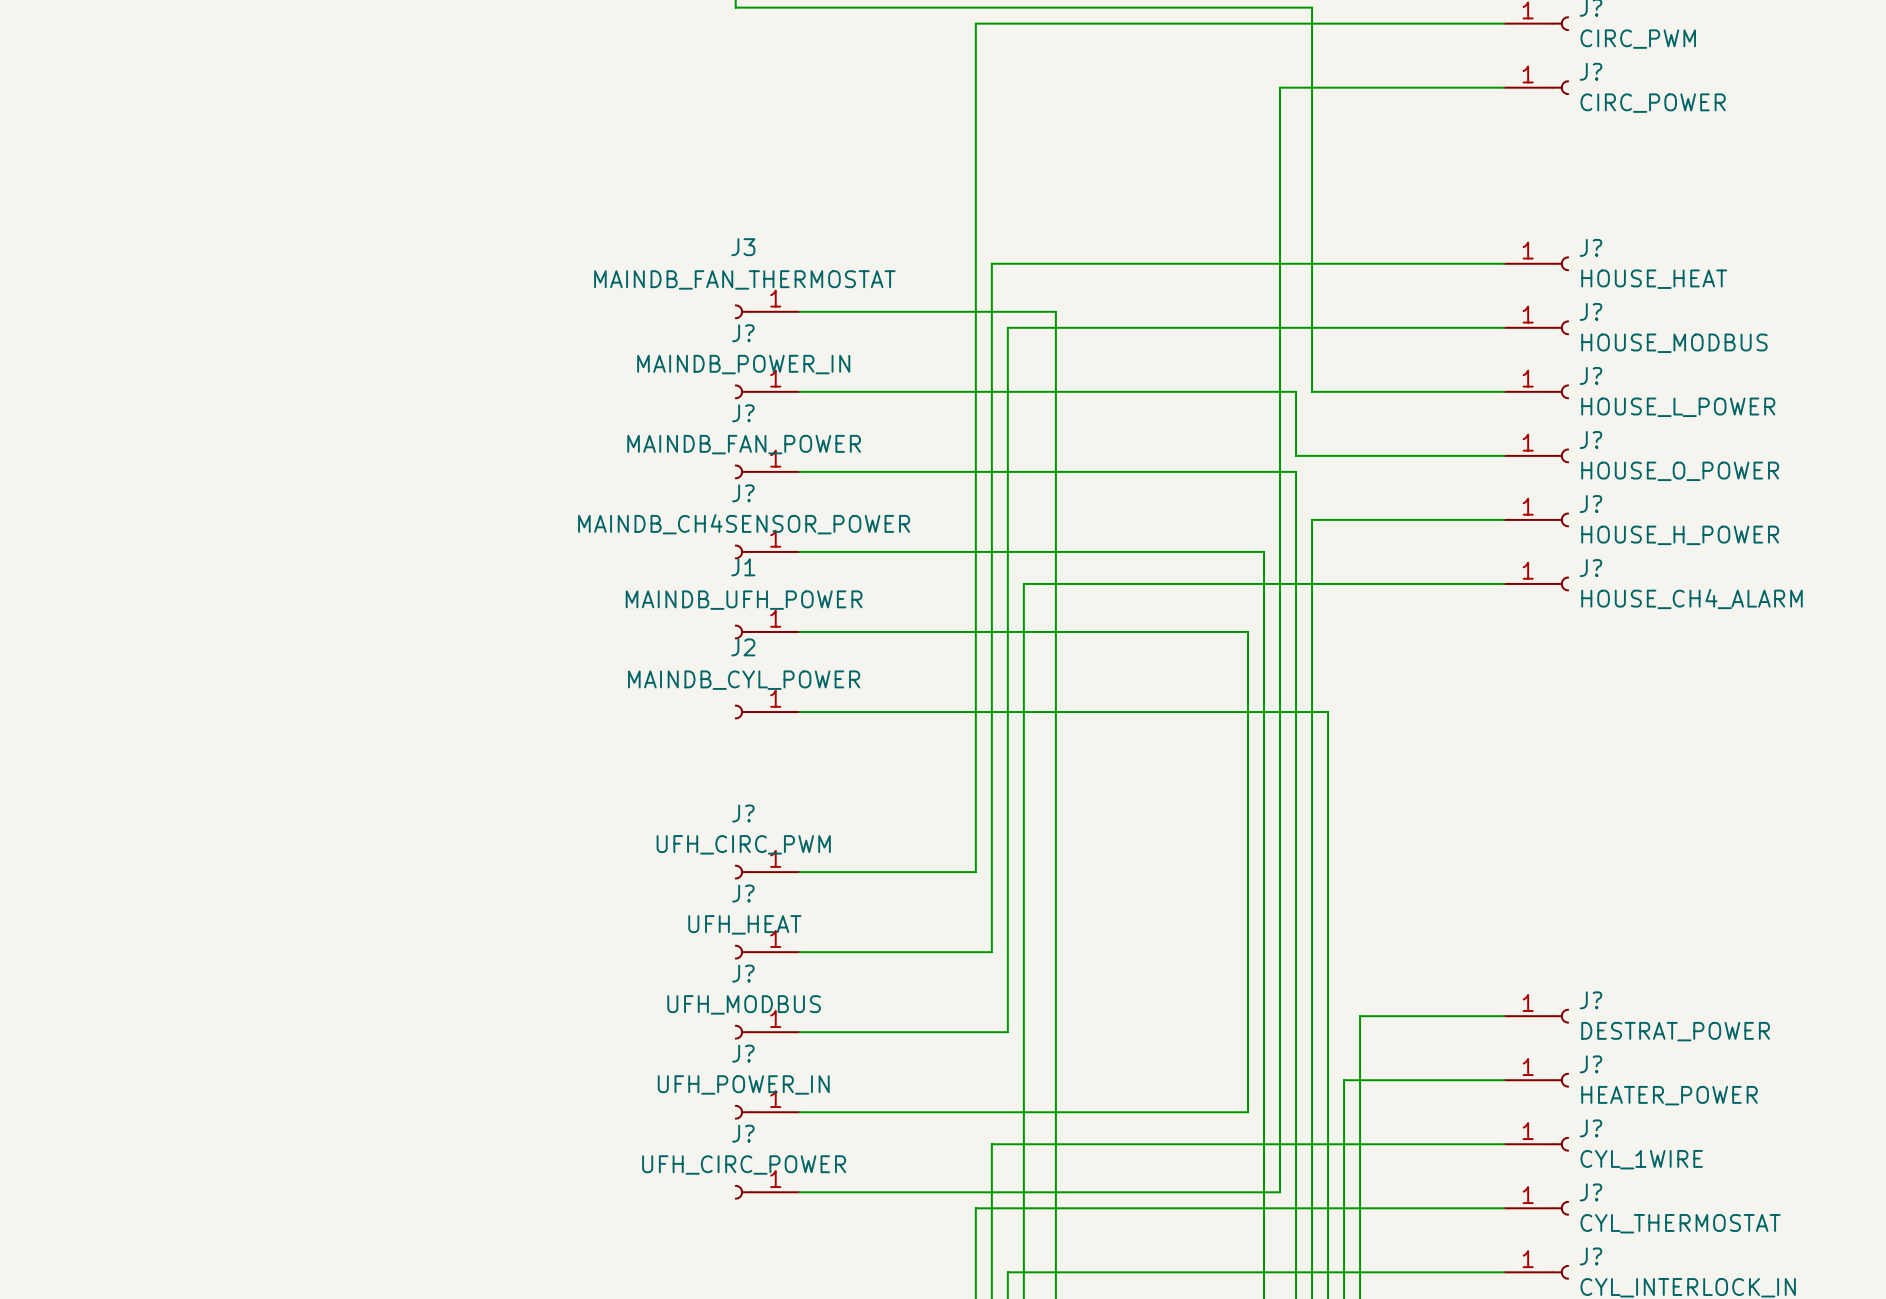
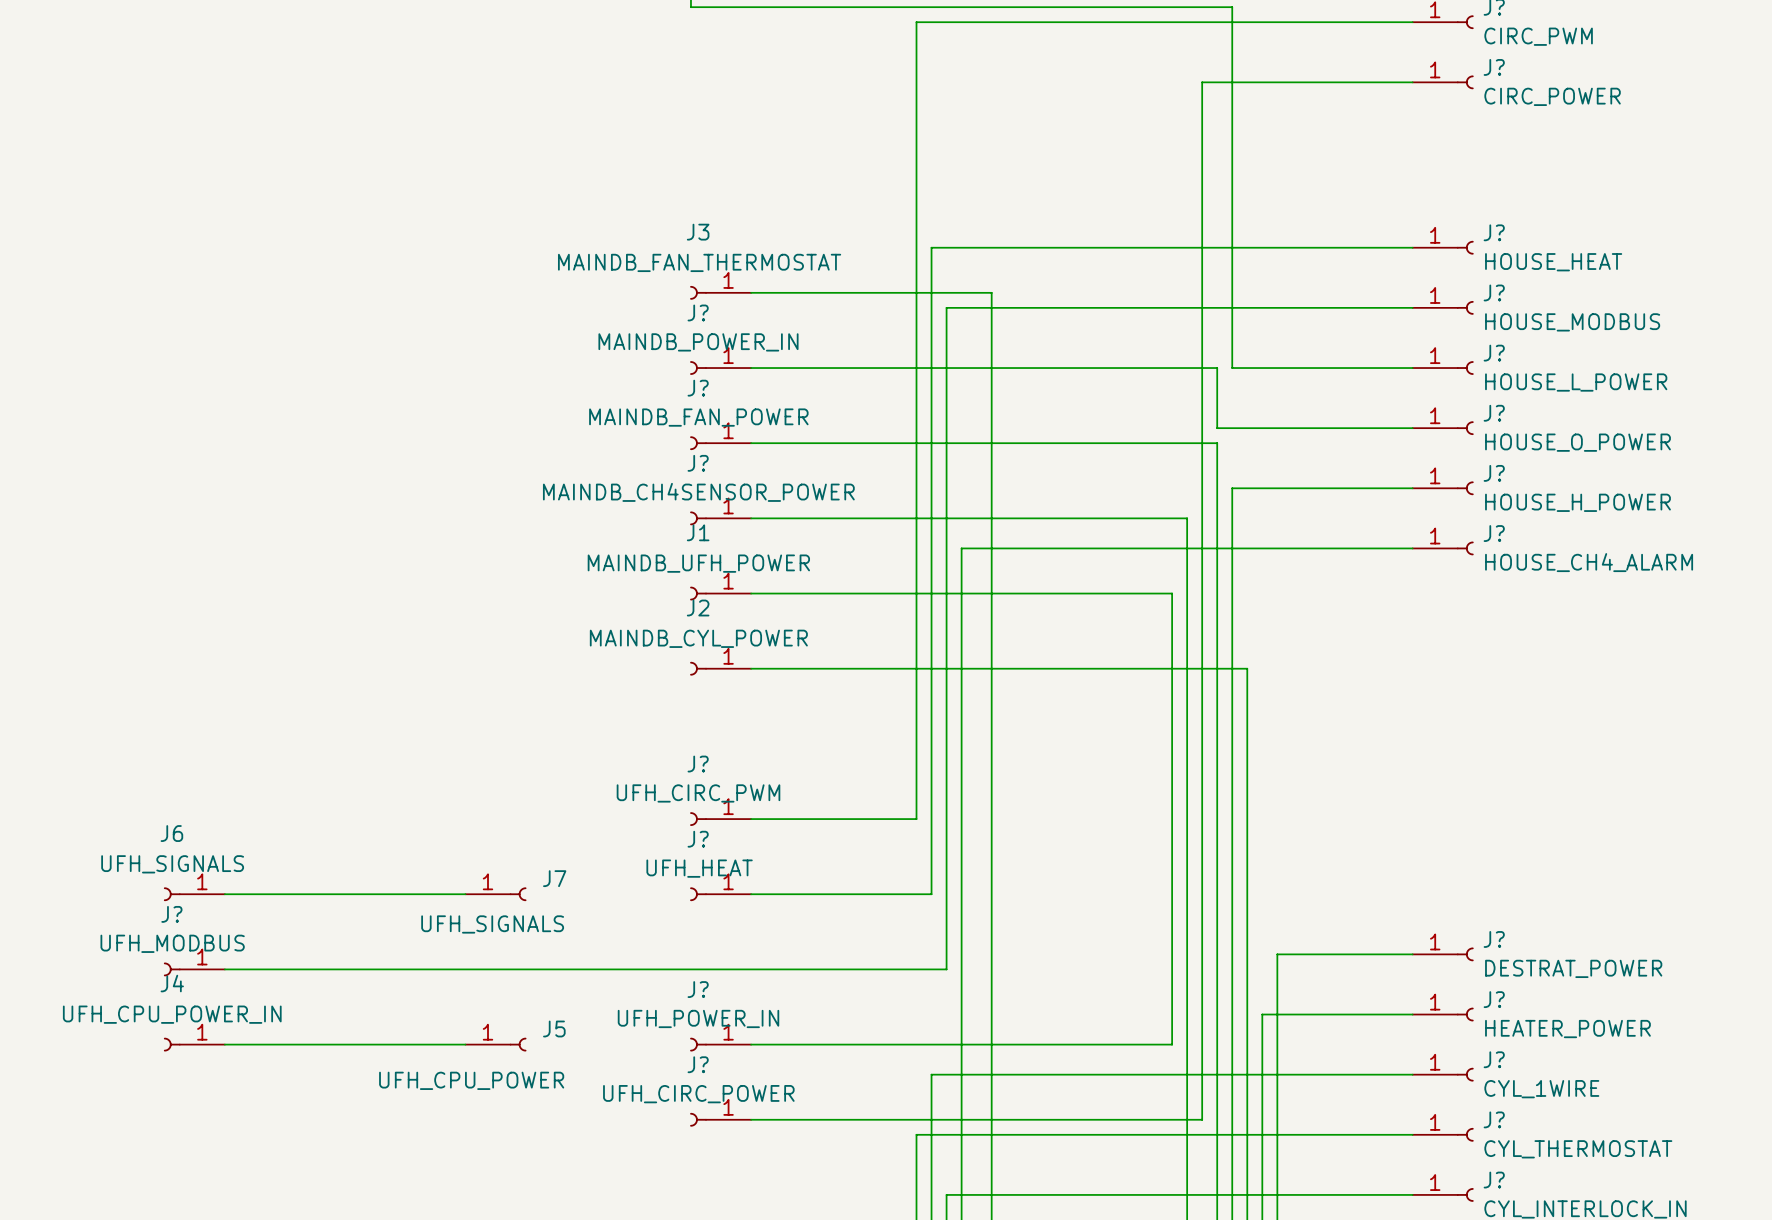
J6: none -> UFH_SIGNALS (194, 894)
wire: none -> (224, 894) (465, 894)
J7: none -> UFH_SIGNALS (495, 894)
J?: none -> UFH_MODBUS (194, 969)
wire: none -> (224, 969) (751, 969)
J?: UFH_MODBUS (767, 1032) -> none
J4: none -> UFH_CPU_POWER_IN (194, 1044)
wire: none -> (224, 1044) (465, 1044)
J5: none -> UFH_CPU_POWER (495, 1044)

